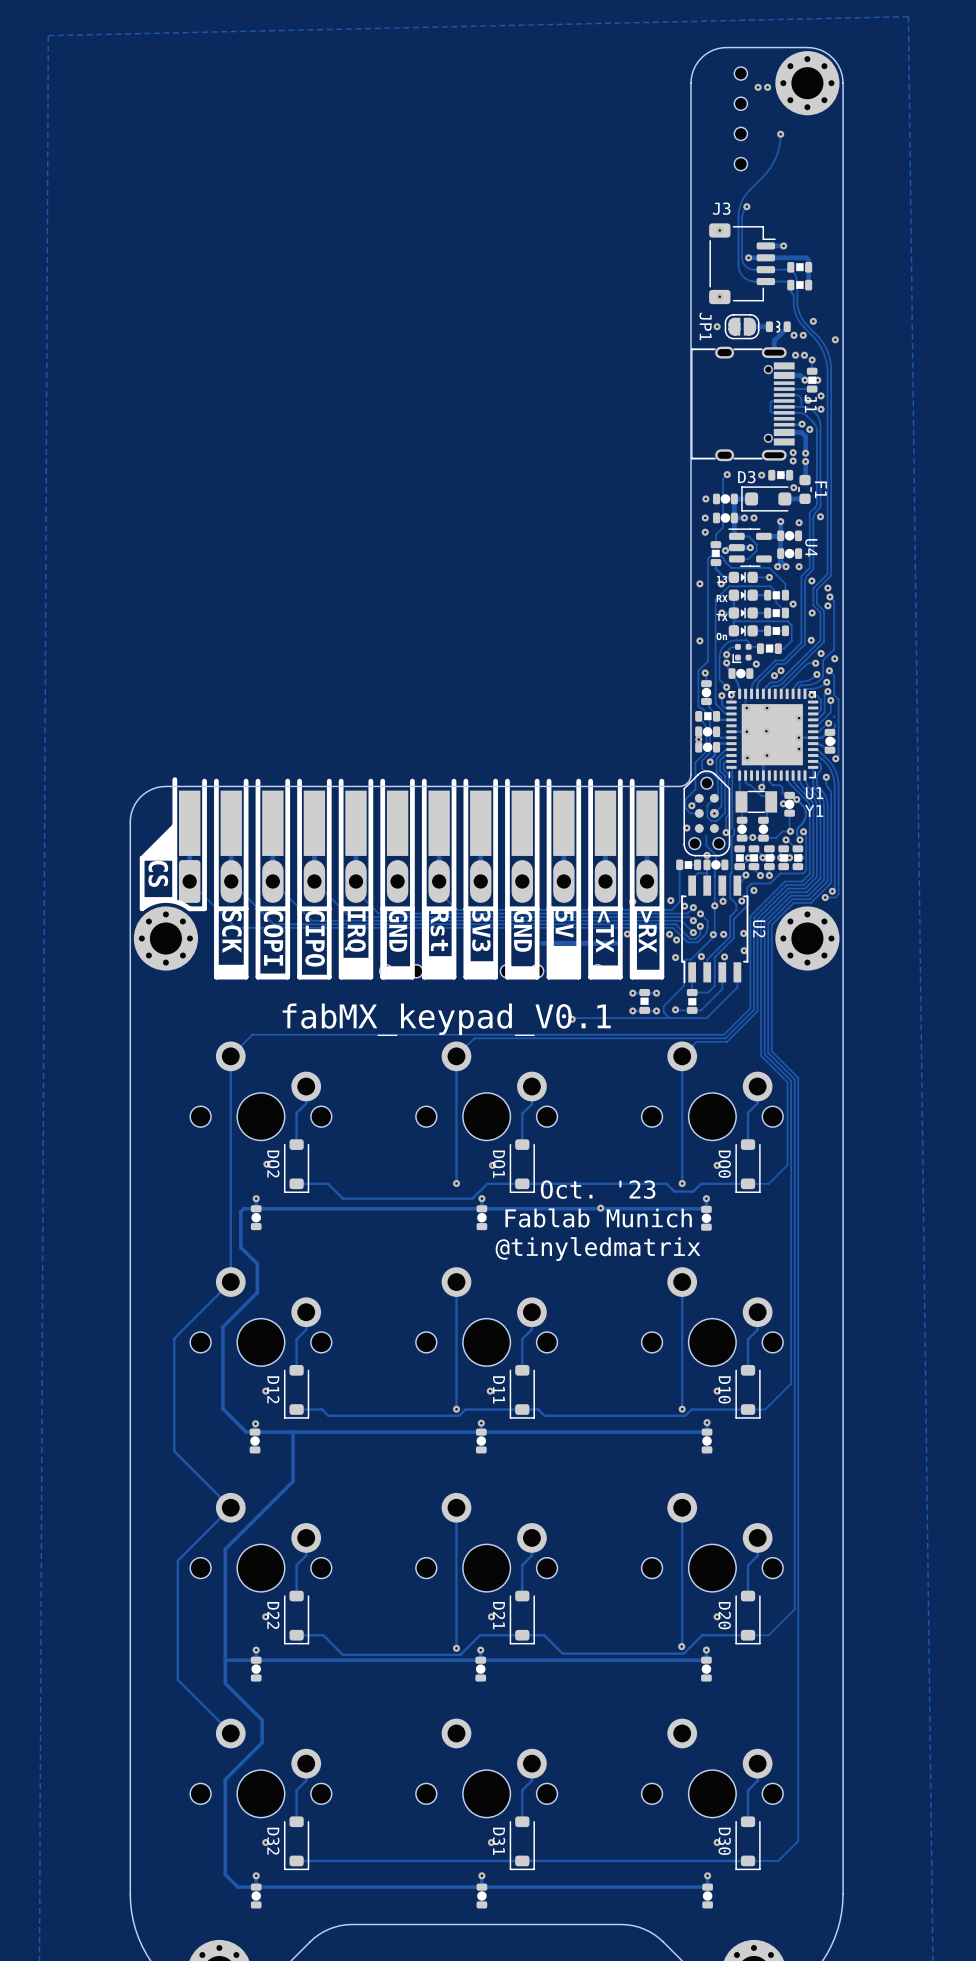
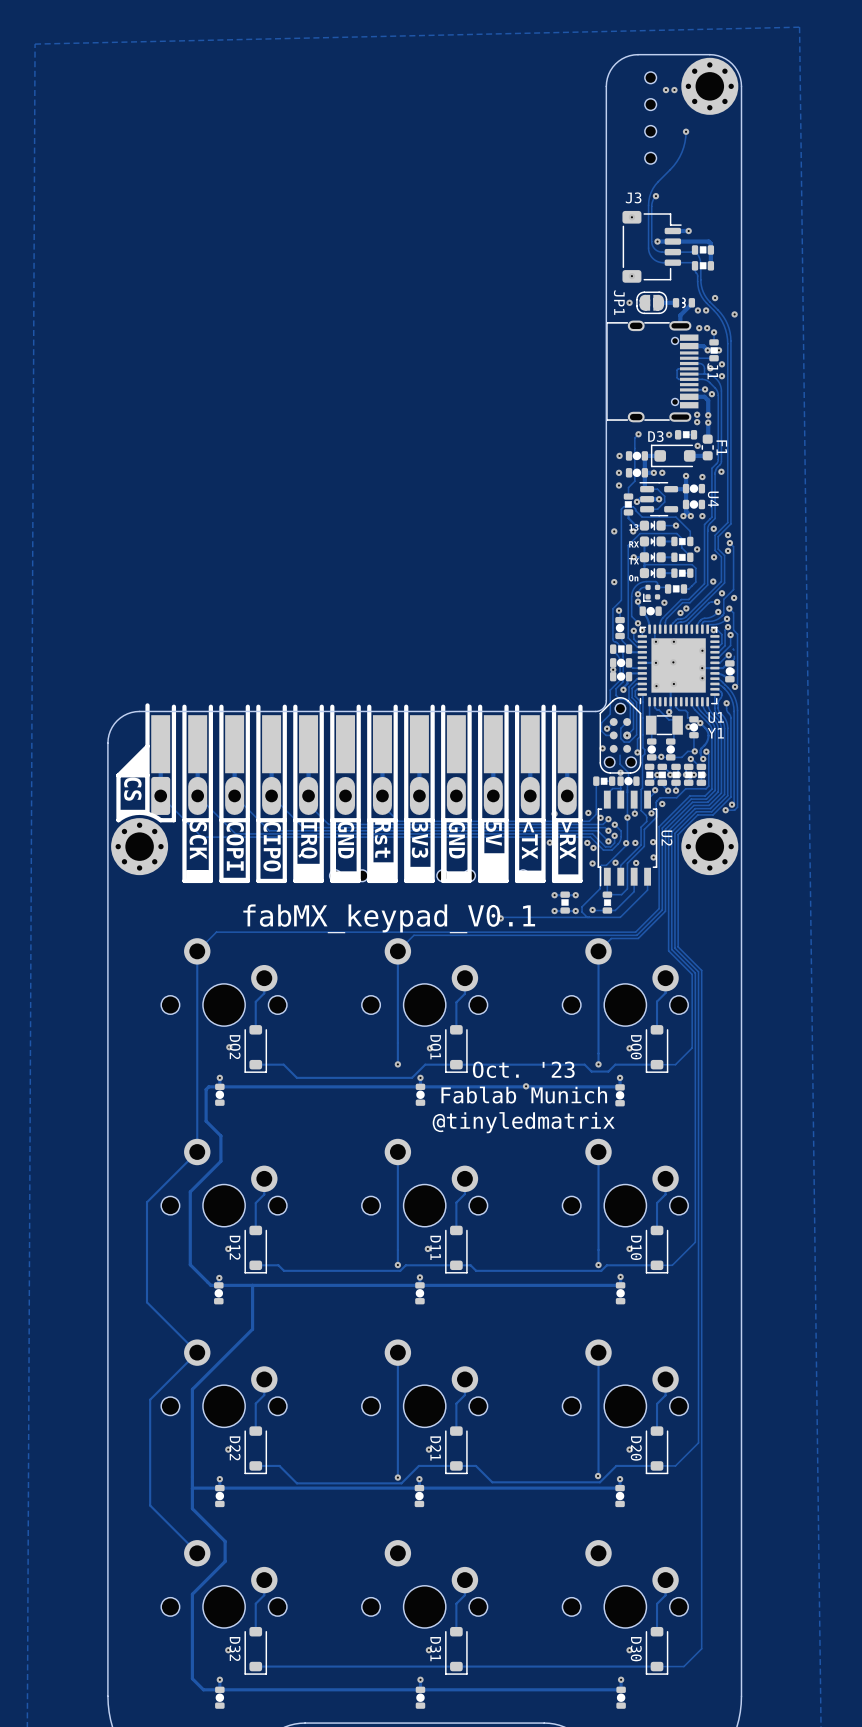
track: (617, 943) (542, 943) -> none

